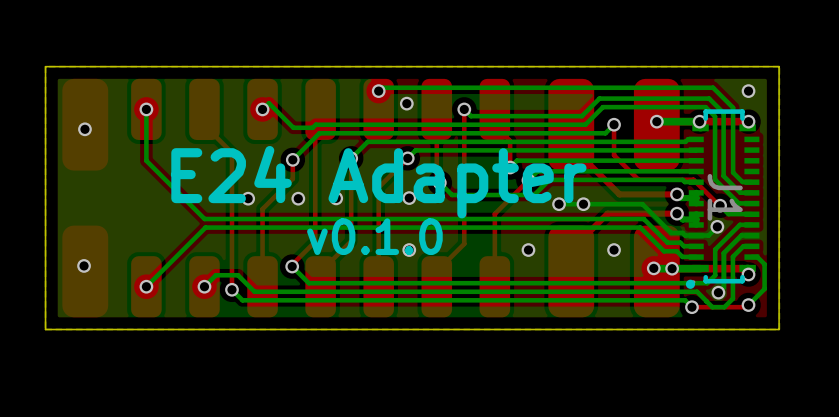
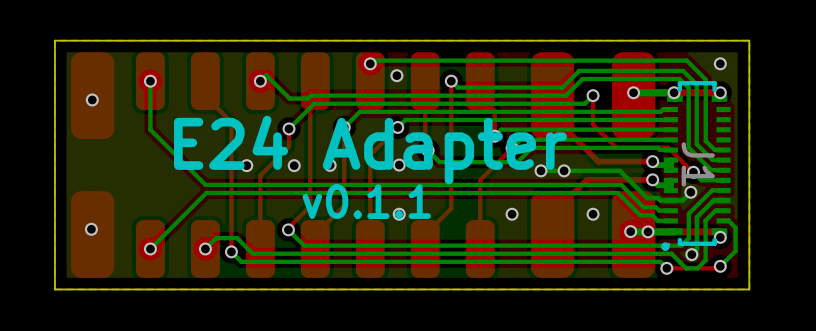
text: v0.1.0 (374, 236) -> v0.1.1 (366, 201)

